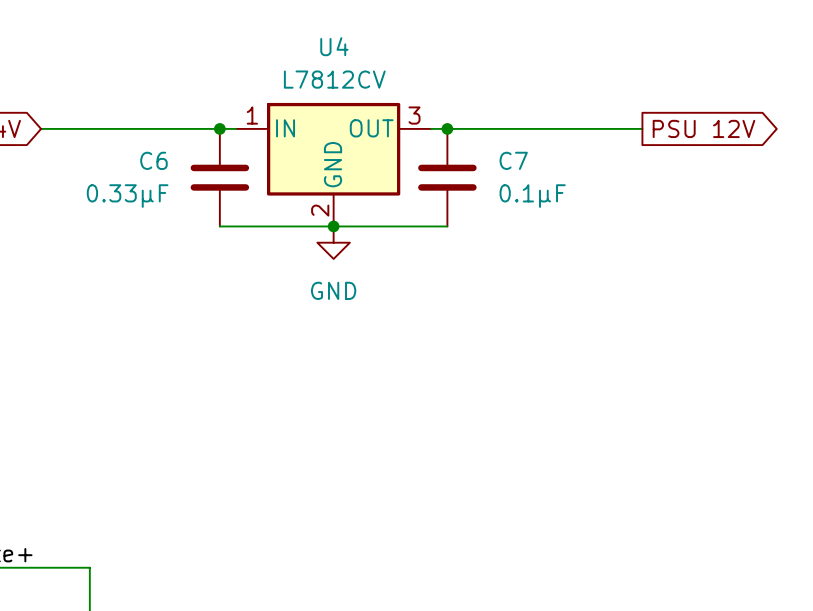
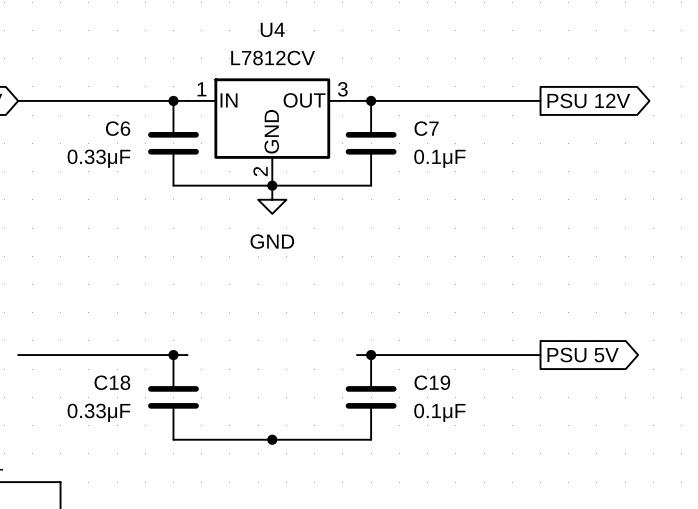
wire: none -> (18, 355) (187, 355)
junction: none -> (173, 355)
wire: none -> (357, 355) (540, 355)
junction: none -> (371, 355)
global label: none -> PSU 5V (583, 355)
C18: none -> 0.33μF (173, 397)
C19: none -> 0.1μF (371, 397)
wire: none -> (173, 439) (371, 439)
junction: none -> (272, 439)

